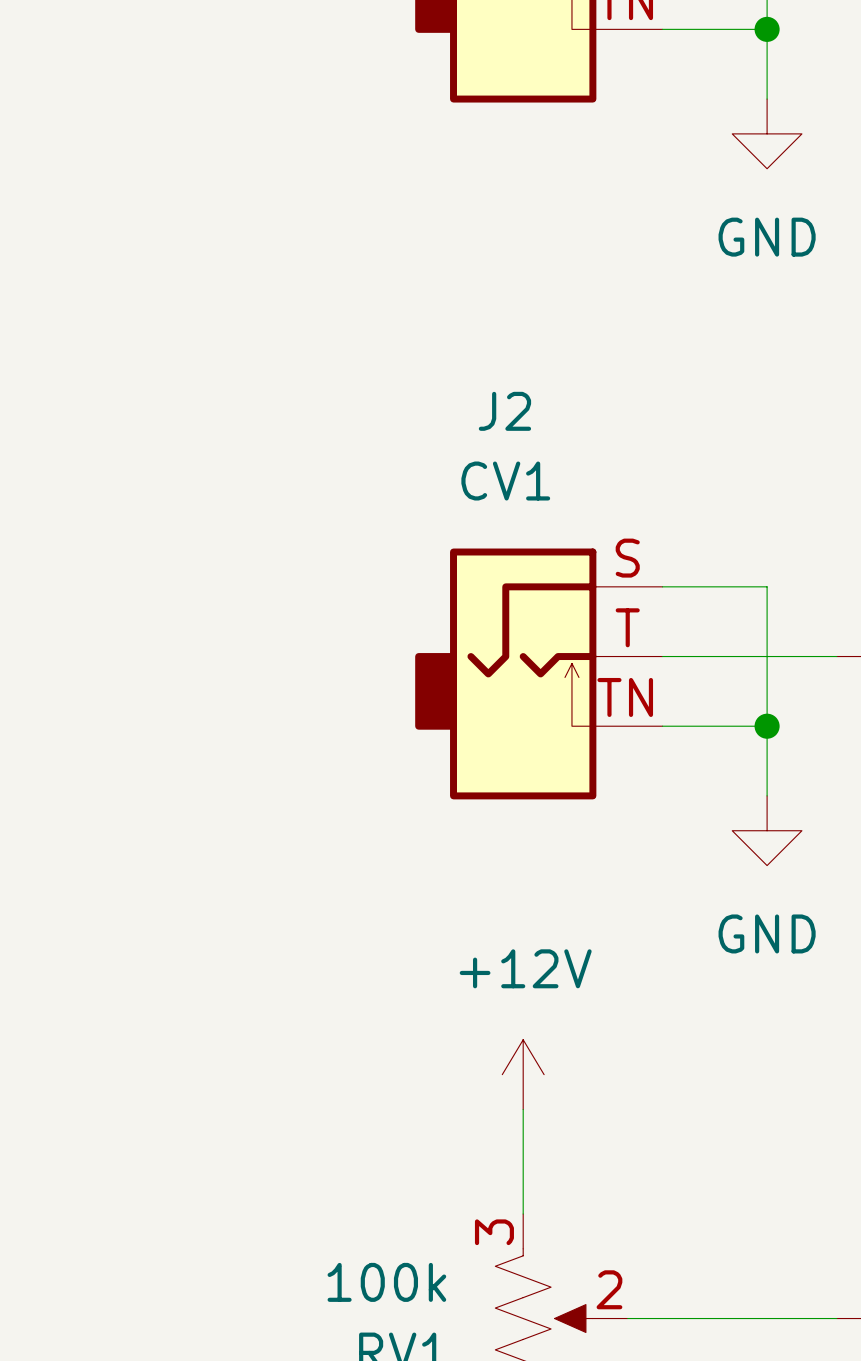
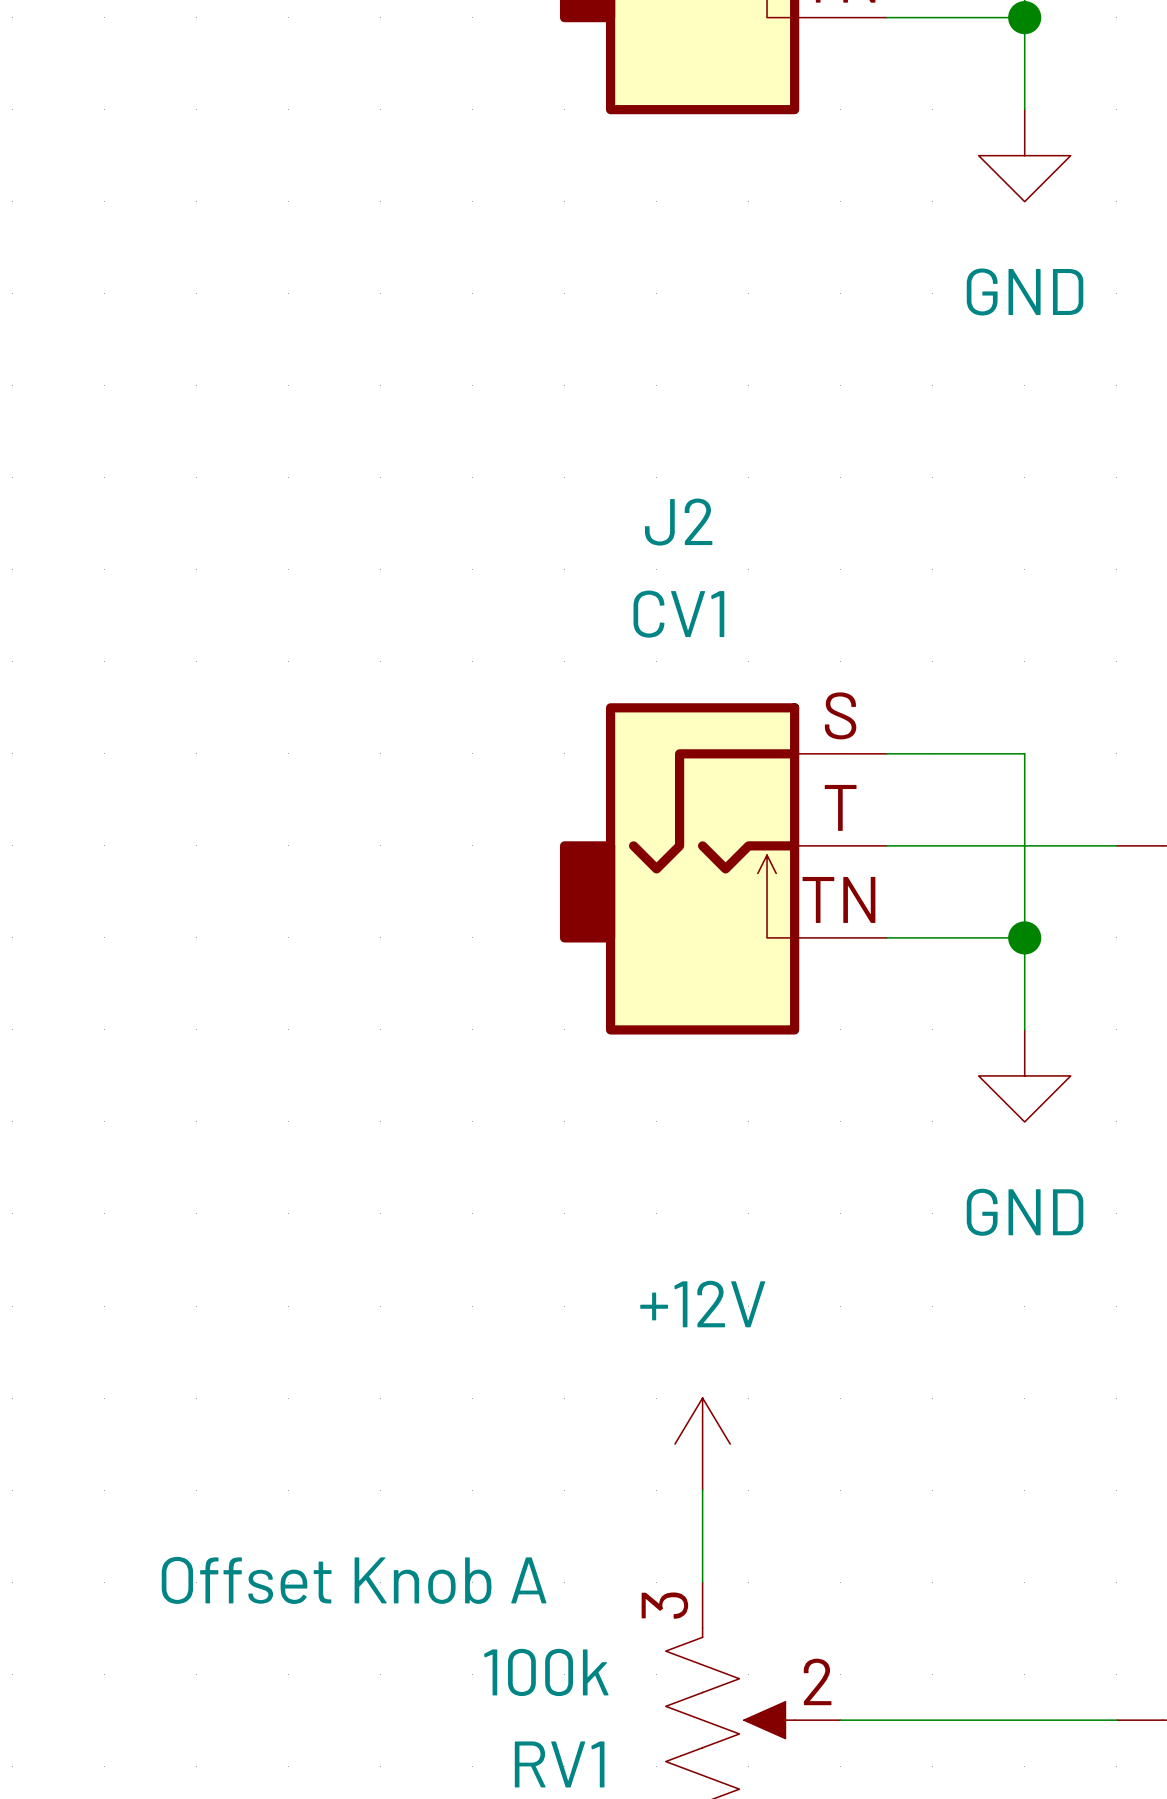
power symbol position: +12V (523, 1074) -> +12V (702, 1444)
RV1 text: none -> Offset Knob A (354, 1580)

